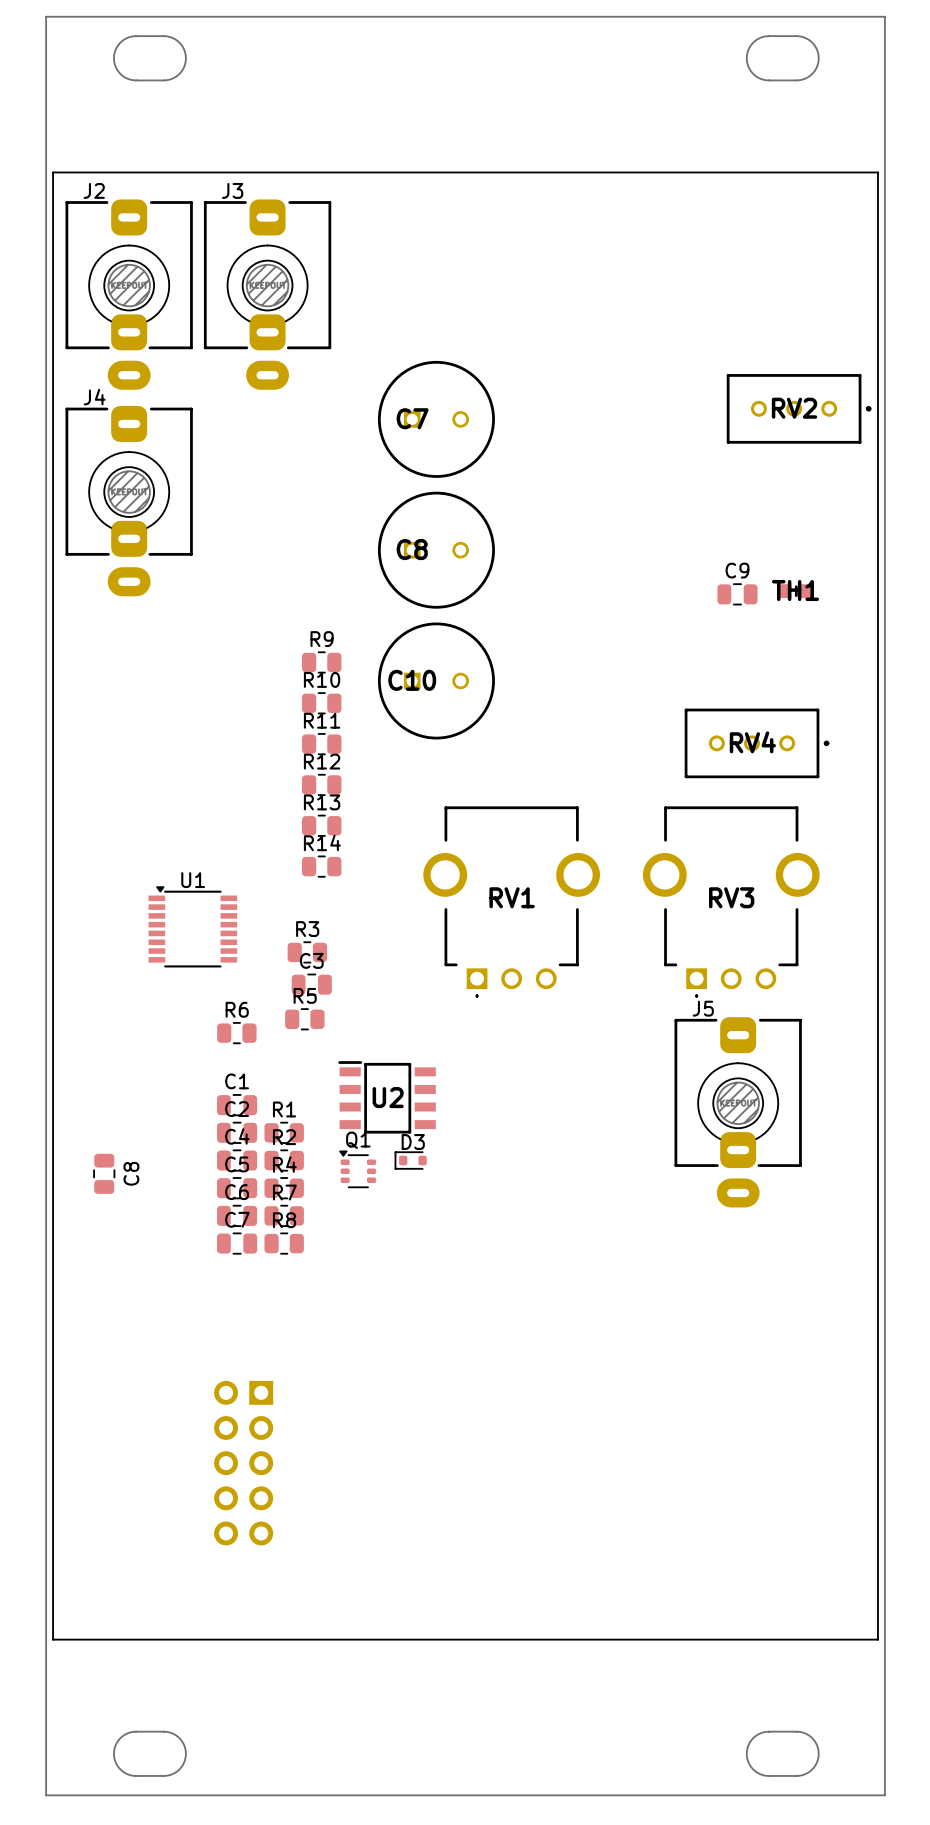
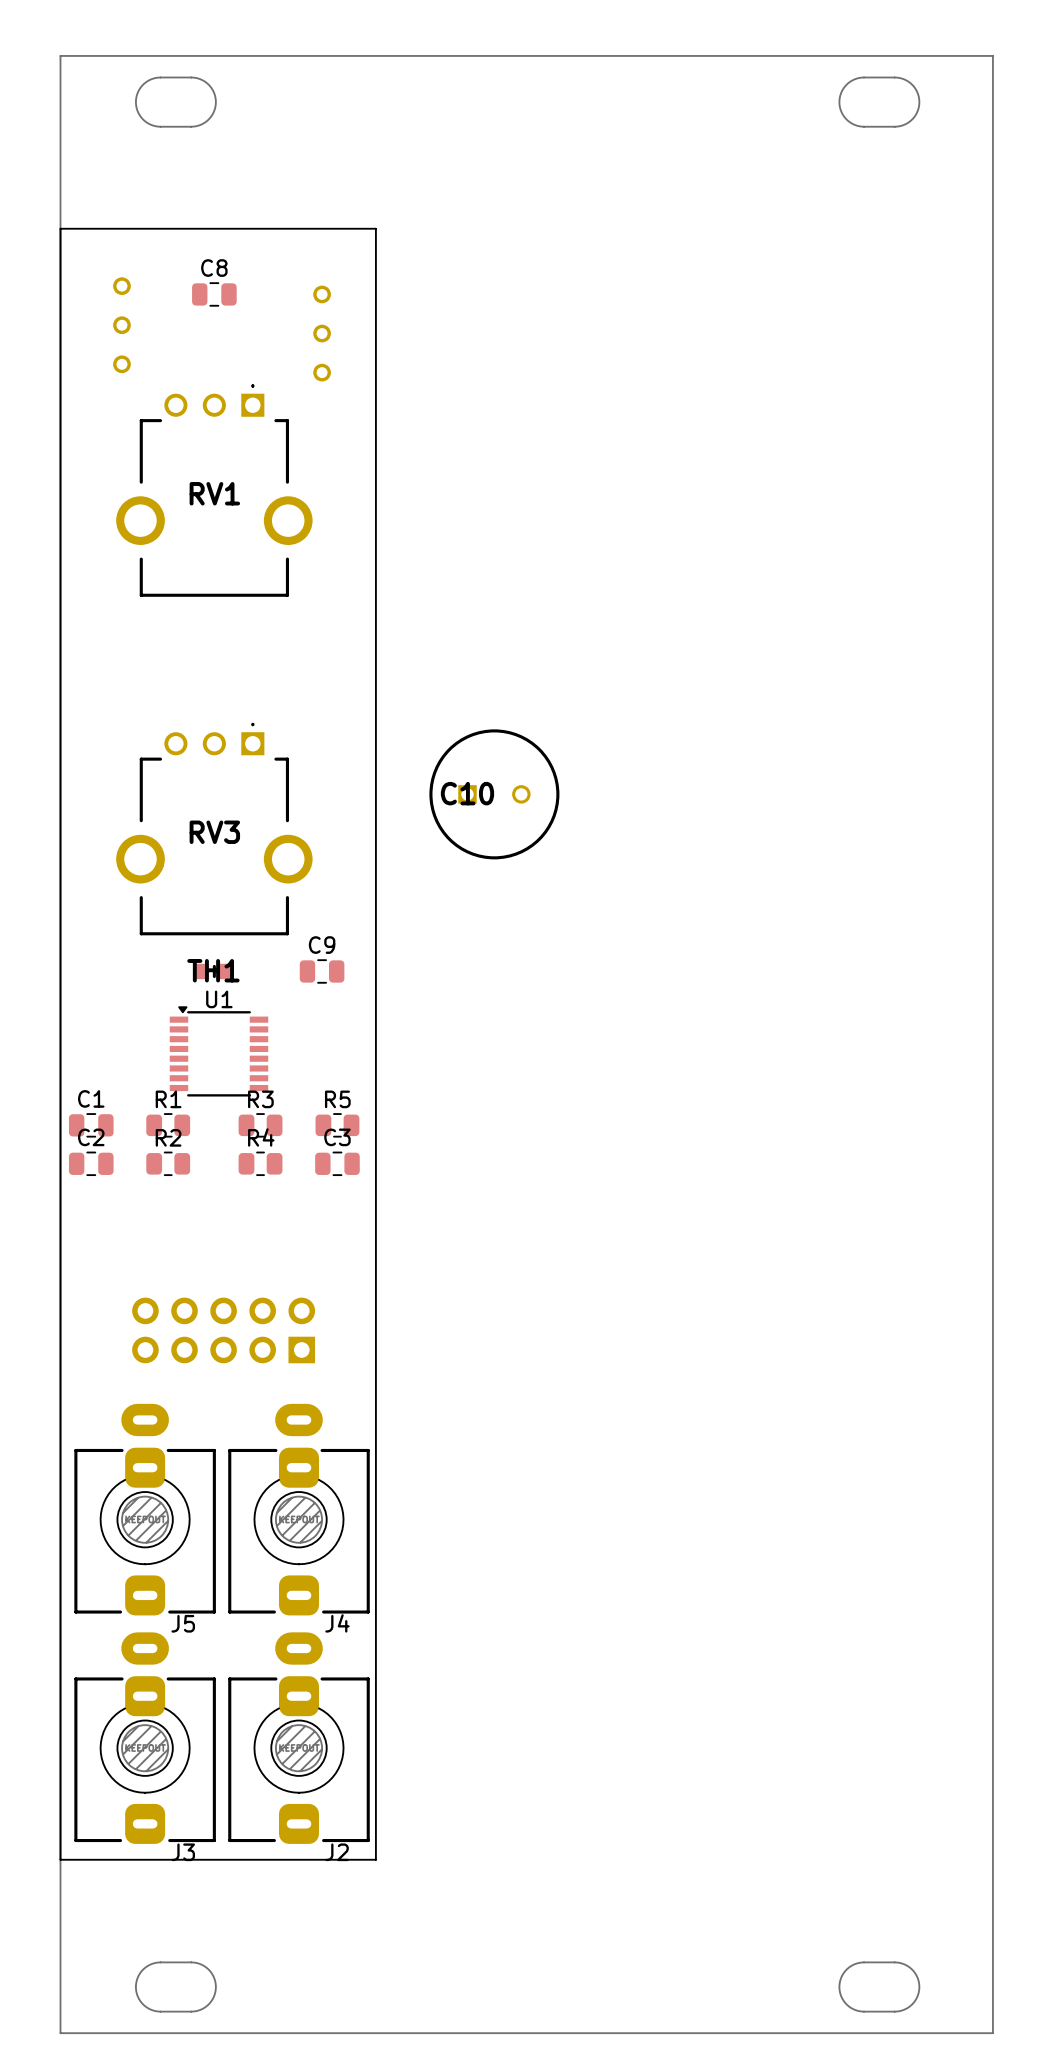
board edge: none -> (60, 228) (375, 228) (375, 1859) (60, 1859) (60, 228)
board edge: (53, 172) (877, 172) (877, 1639) (53, 1639) (53, 172) -> none
C8: none -> (214, 294)
part: none -> (121, 325)
part: none -> (322, 333)
J2 rotation: 0° (129, 294) -> 180° (299, 1738)
J2 position: (129, 294) -> (299, 1738)
J3 rotation: 0° (267, 294) -> 180° (145, 1738)
J3 position: (267, 294) -> (145, 1738)
RV2: (799, 408) -> none
C7: (436, 419) -> none
J4 rotation: 0° (129, 501) -> 180° (299, 1509)
J4 position: (129, 501) -> (299, 1509)
C8: (436, 550) -> none
TH1 position: (796, 591) -> (214, 971)
C9 position: (737, 594) -> (322, 971)
R9: (321, 662) -> none
R10: (321, 703) -> none
RV4: (757, 743) -> none
R11: (321, 744) -> none
R12: (321, 784) -> none
R13: (321, 825) -> none
R14: (321, 866) -> none
RV1 rotation: 0° (511, 901) -> 180° (214, 490)
RV1 position: (511, 901) -> (214, 490)
RV3 rotation: 0° (731, 901) -> 180° (214, 829)
RV3 position: (731, 901) -> (214, 829)
U1 position: (192, 926) -> (218, 1051)
R3 position: (307, 952) -> (260, 1125)
C3 position: (311, 984) -> (337, 1163)
R5 position: (304, 1019) -> (337, 1125)
R6: (236, 1033) -> none
U2: (387, 1097) -> none
C1 position: (237, 1105) -> (91, 1125)
J5 rotation: 0° (738, 1112) -> 180° (145, 1509)
J5 position: (738, 1112) -> (145, 1509)
C2 position: (237, 1132) -> (91, 1163)
R1 position: (284, 1132) -> (168, 1125)
C4: (237, 1160) -> none
R2 position: (284, 1160) -> (168, 1163)
D3: (410, 1160) -> none
Q1: (357, 1169) -> none
C8: (104, 1173) -> none
C5: (237, 1188) -> none
R4 position: (284, 1188) -> (260, 1163)
C6: (237, 1215) -> none
R7: (284, 1215) -> none
C7: (237, 1243) -> none
R8: (284, 1243) -> none
part rotation: 0° (243, 1463) -> 90° clockwise (223, 1330)
part position: (243, 1463) -> (223, 1330)

